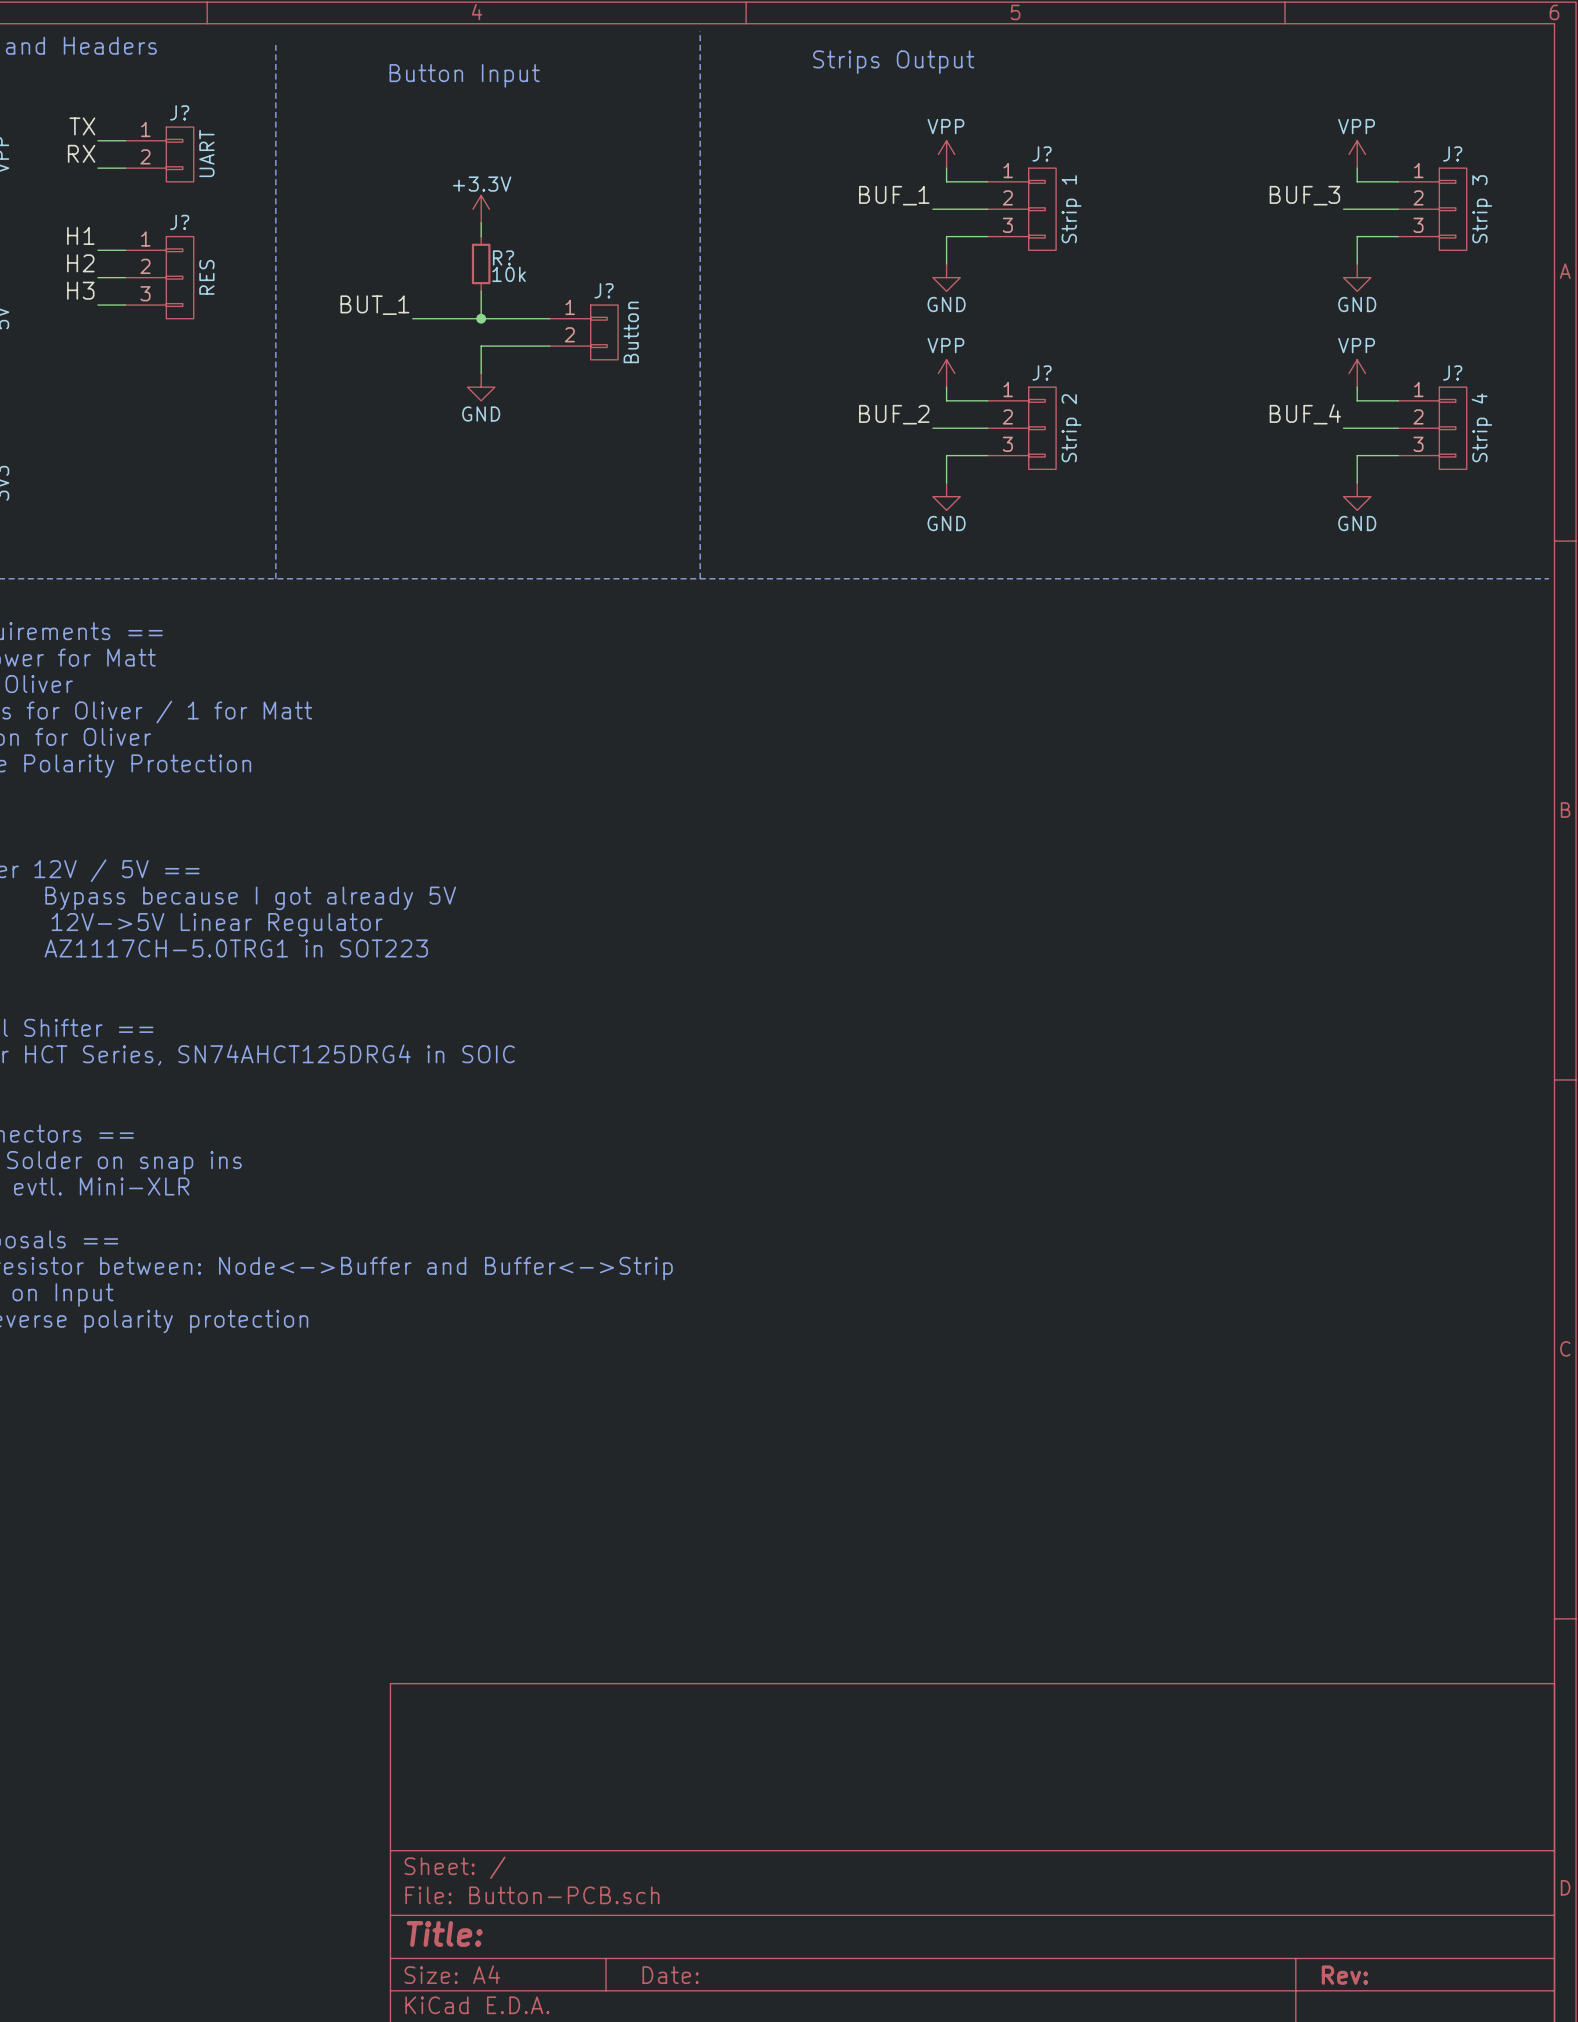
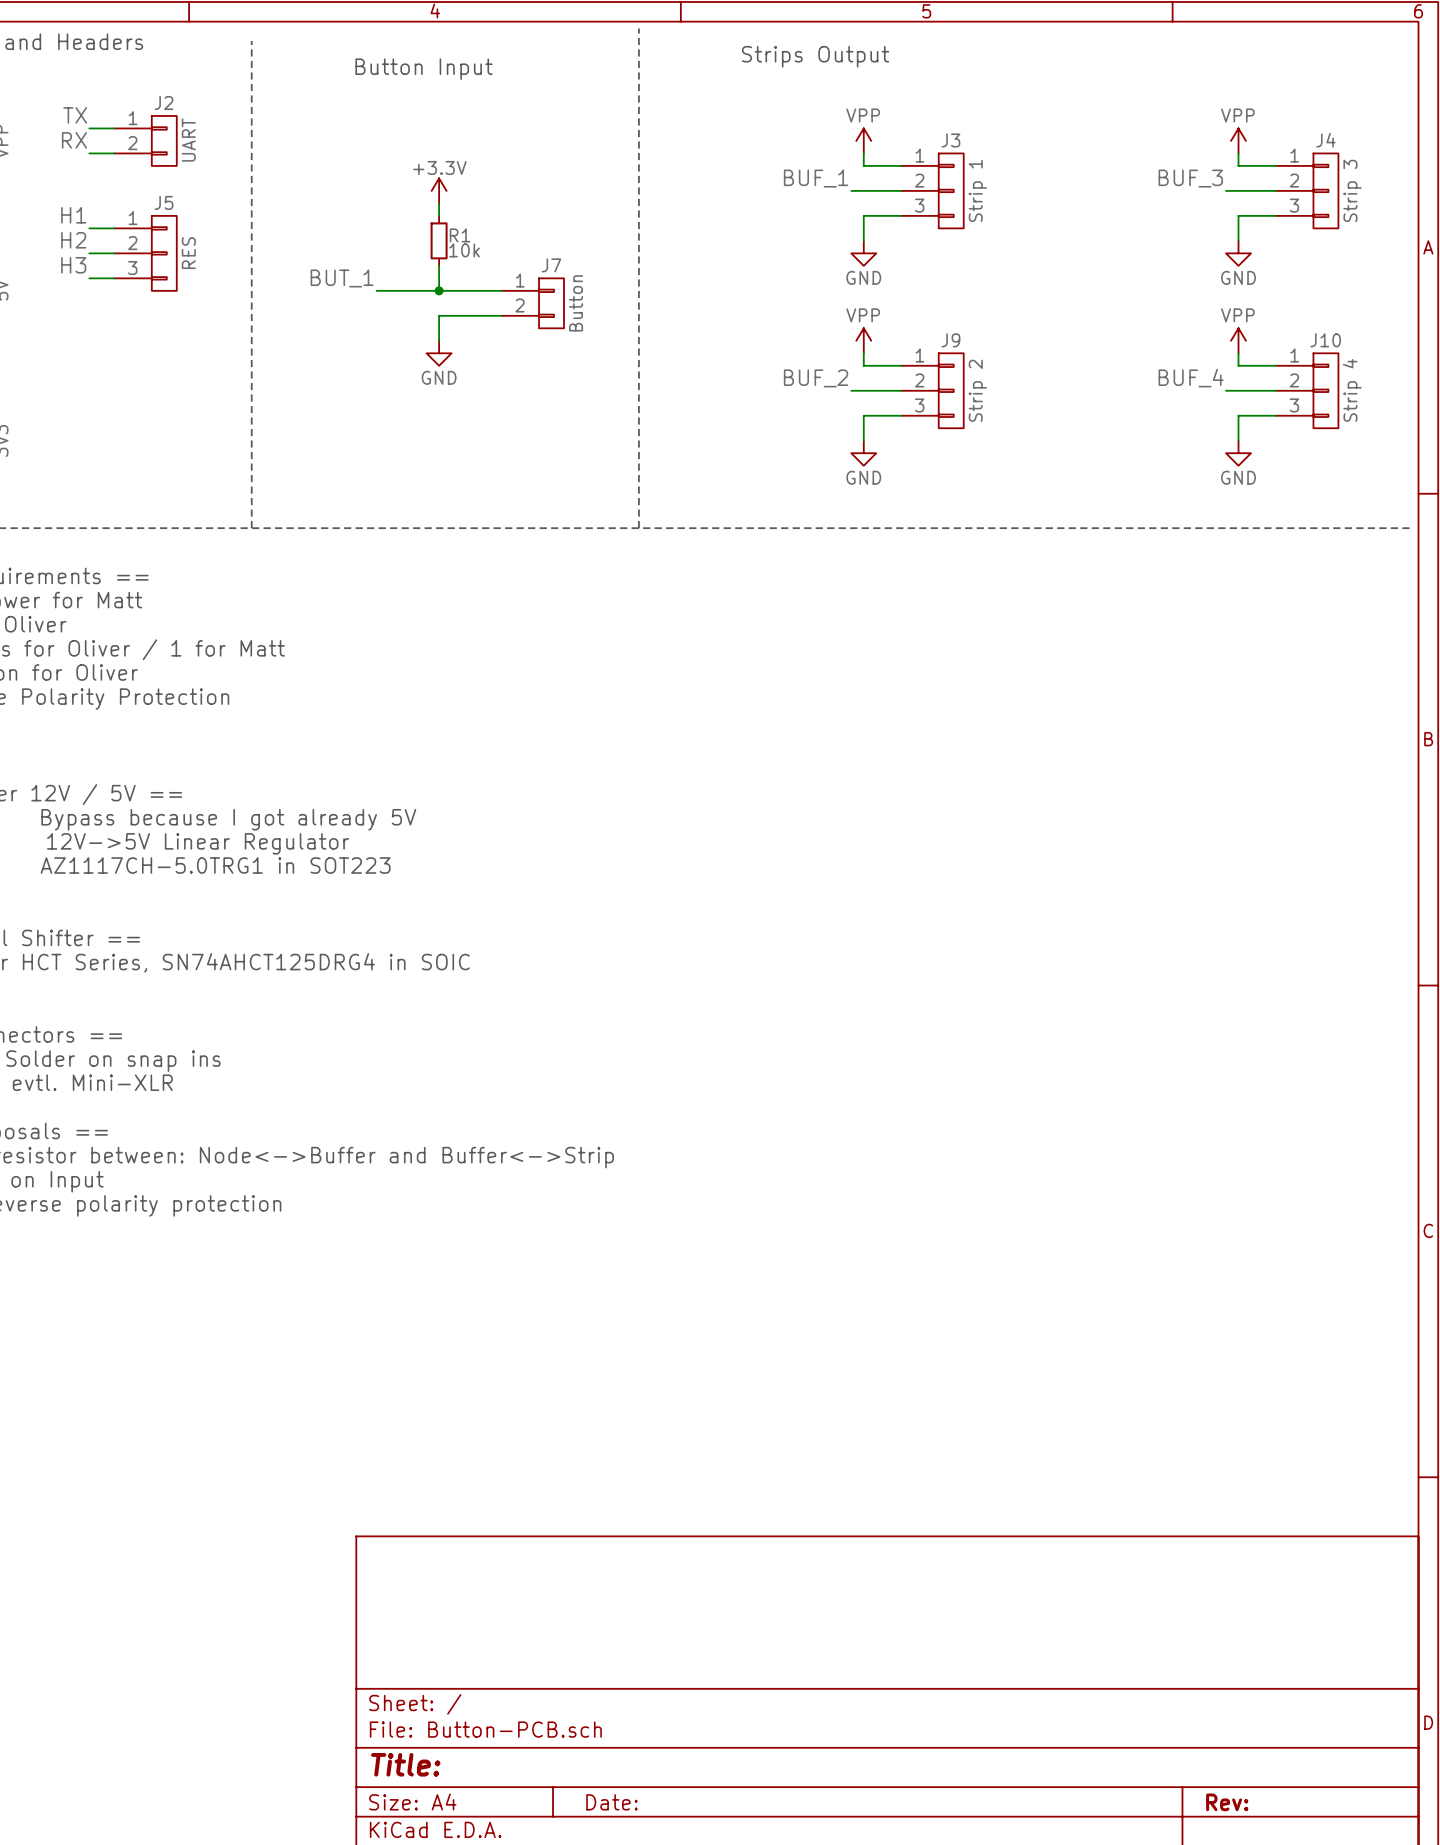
J? name: J? (179, 112) -> J2 (164, 103)
J? name: J? (1042, 153) -> J3 (950, 140)
J? name: J? (1452, 153) -> J4 (1325, 140)
J? name: J? (179, 222) -> J5 (164, 202)
R? name: R? (503, 257) -> R1 (460, 235)
J? name: J? (604, 290) -> J7 (551, 265)
J? name: J? (1042, 372) -> J9 (950, 340)
J? name: J? (1452, 372) -> J10 (1325, 340)

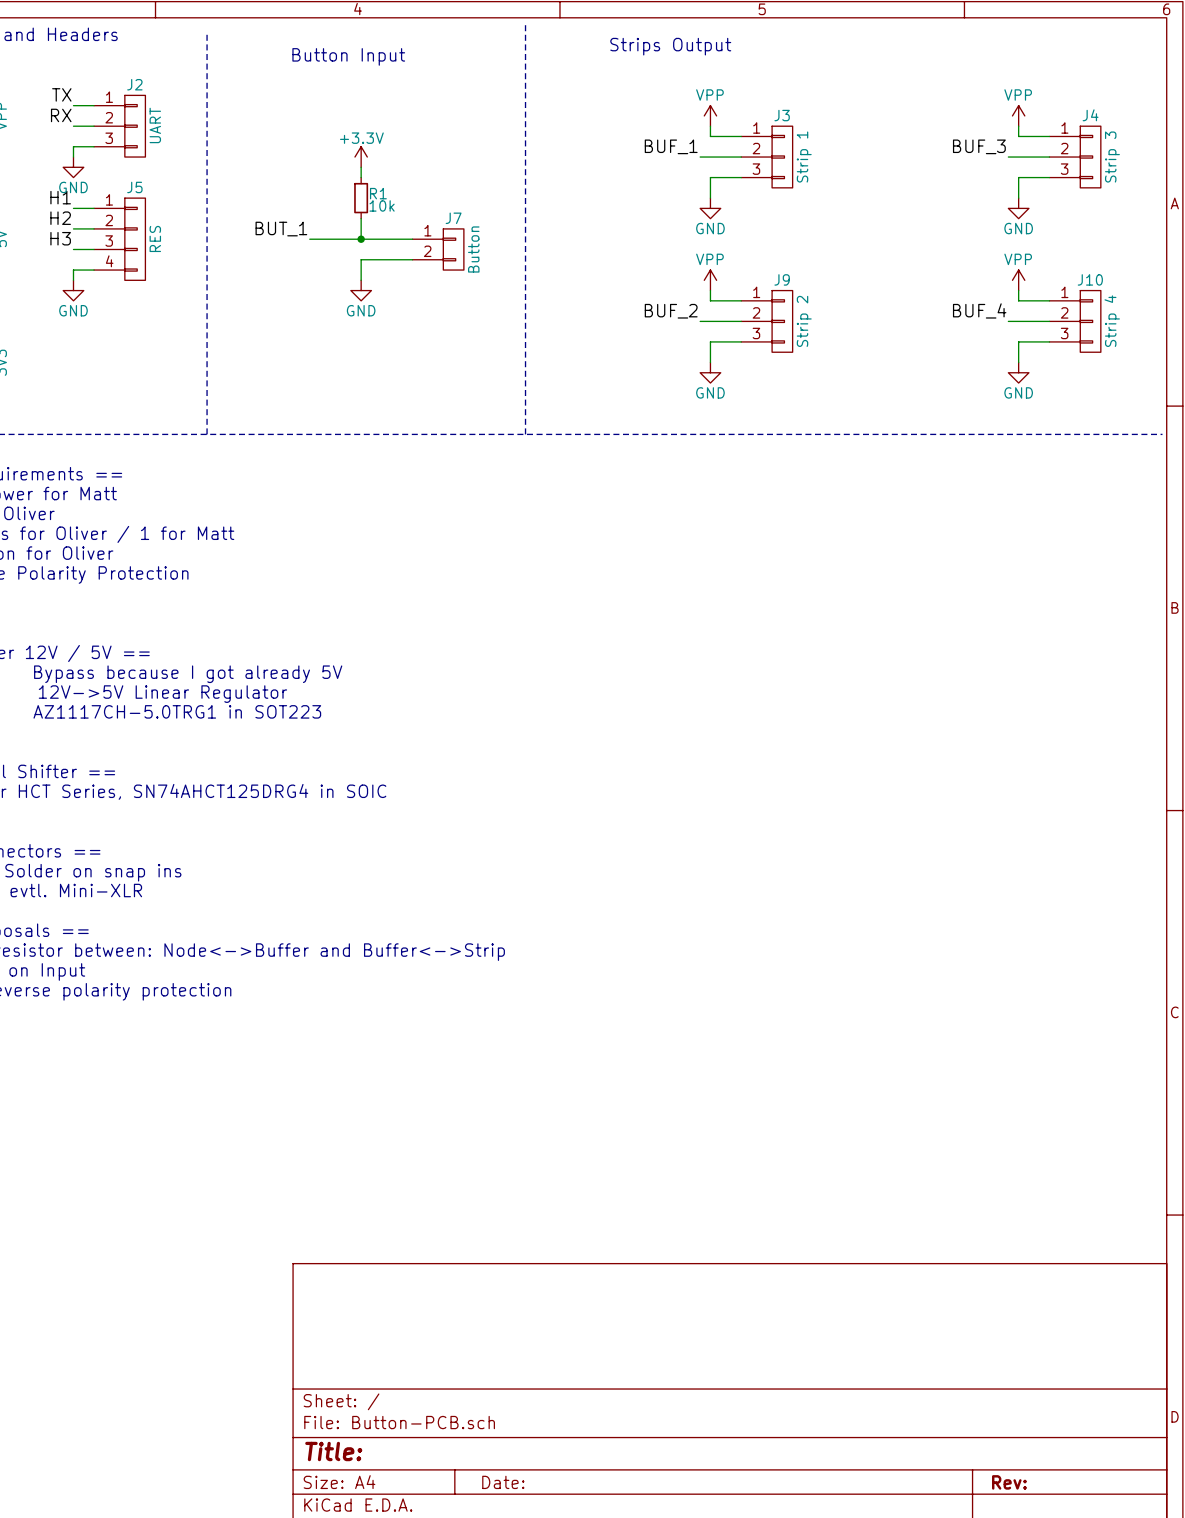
J2 symbol: [114, 115, 177, 166] -> [94, 95, 146, 158]
wire: none -> (94, 146) (73, 146) (73, 157)
power symbol: none -> GND (73, 167)
label: H1 (73, 215) -> none
J5 symbol: [114, 215, 177, 291] -> [94, 198, 146, 281]
wire: (89, 228) (114, 228) -> (73, 249) (94, 249)
label: H2 (73, 240) -> H1 (60, 197)
label: H3 (73, 265) -> H2 (60, 218)
label: none -> H3 (60, 238)
wire: none -> (94, 270) (73, 270) (73, 280)
power symbol: none -> GND (73, 290)

